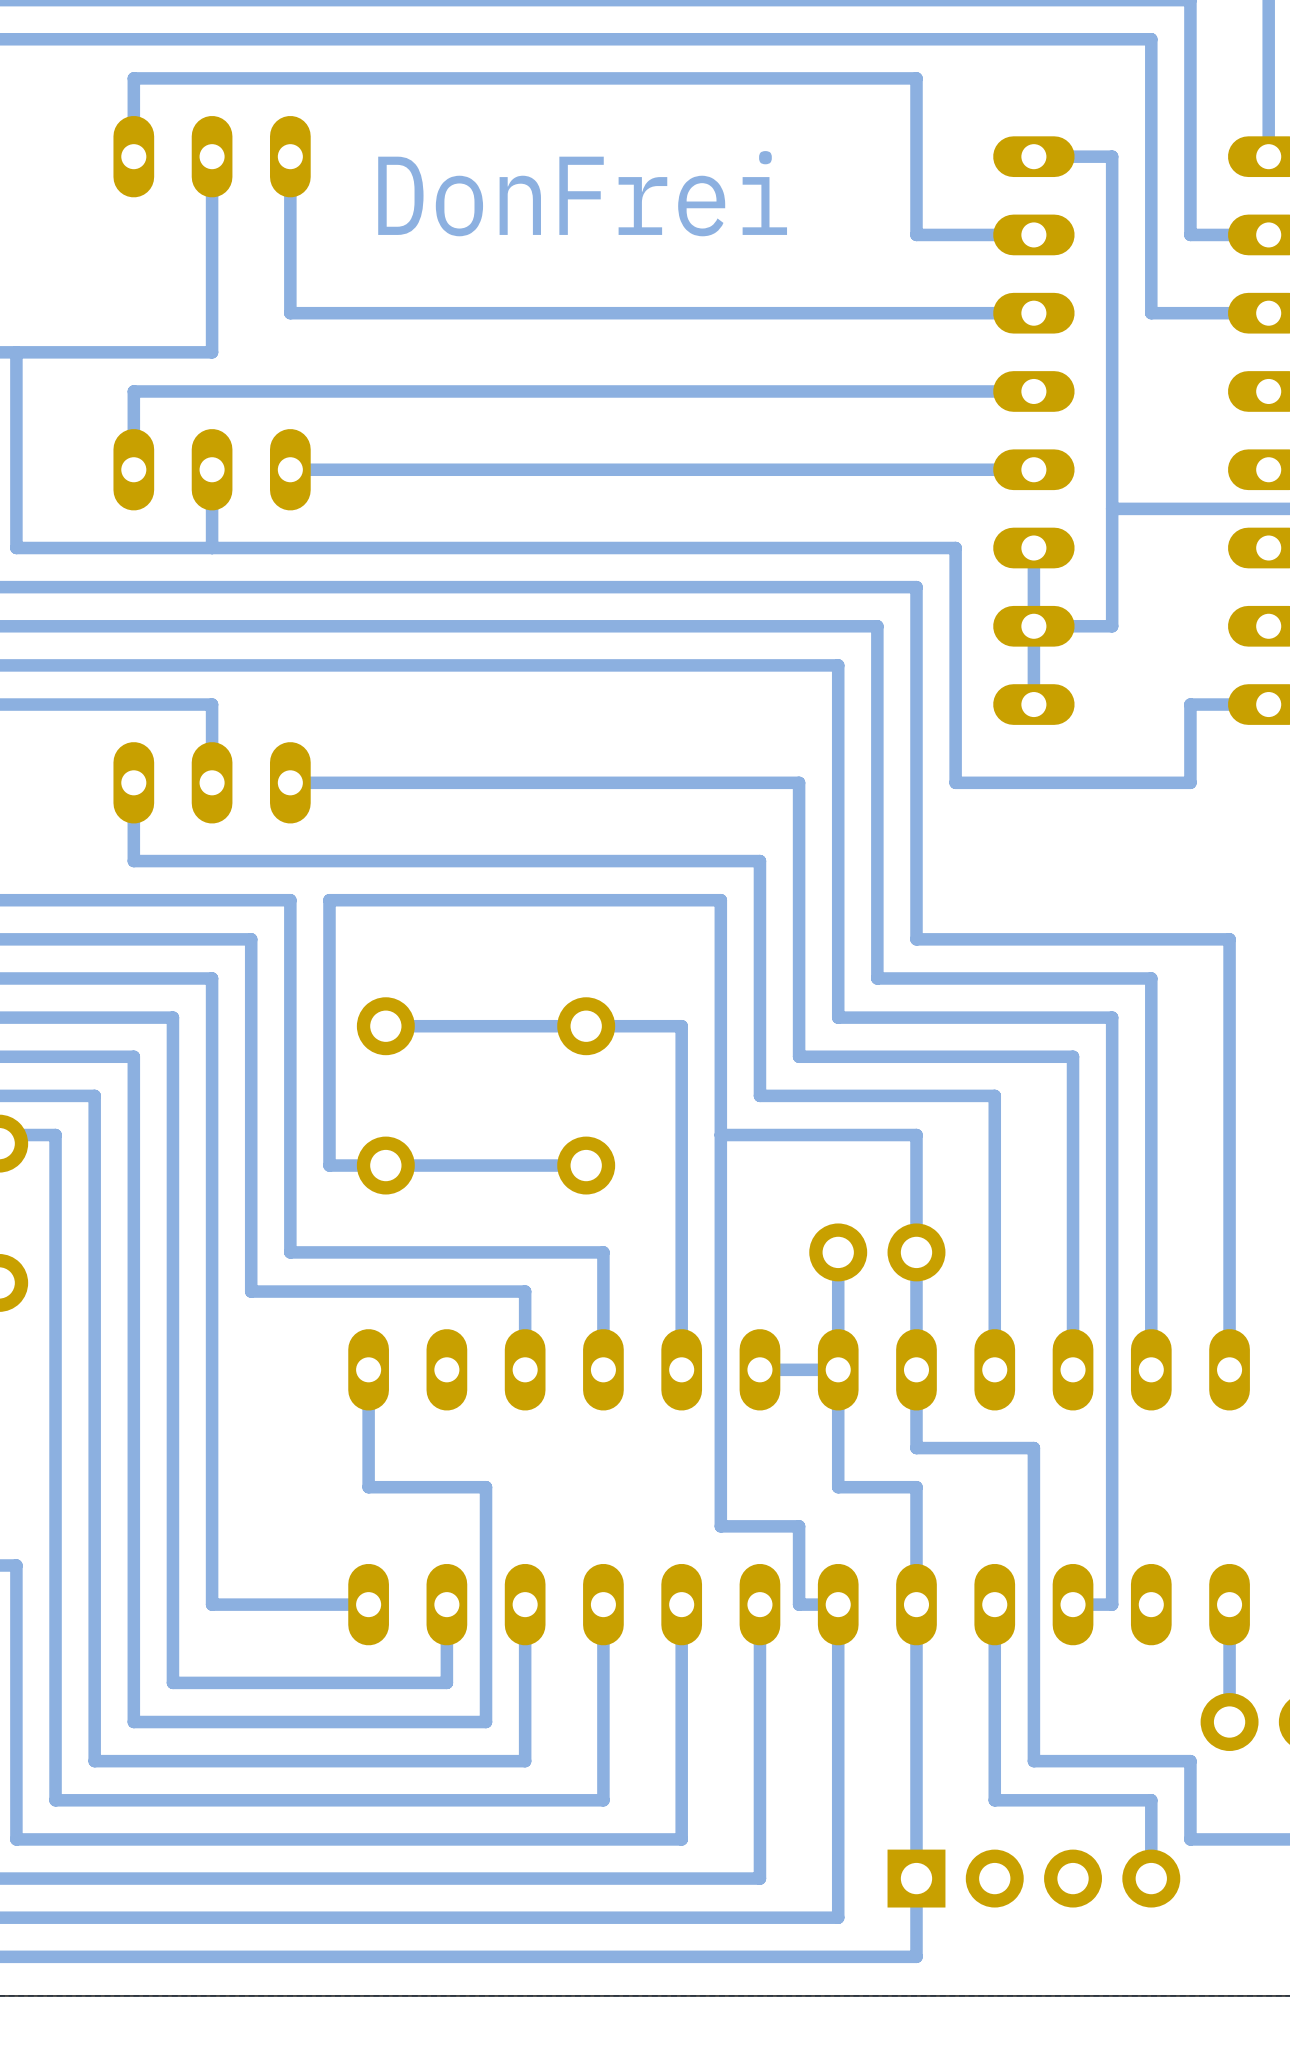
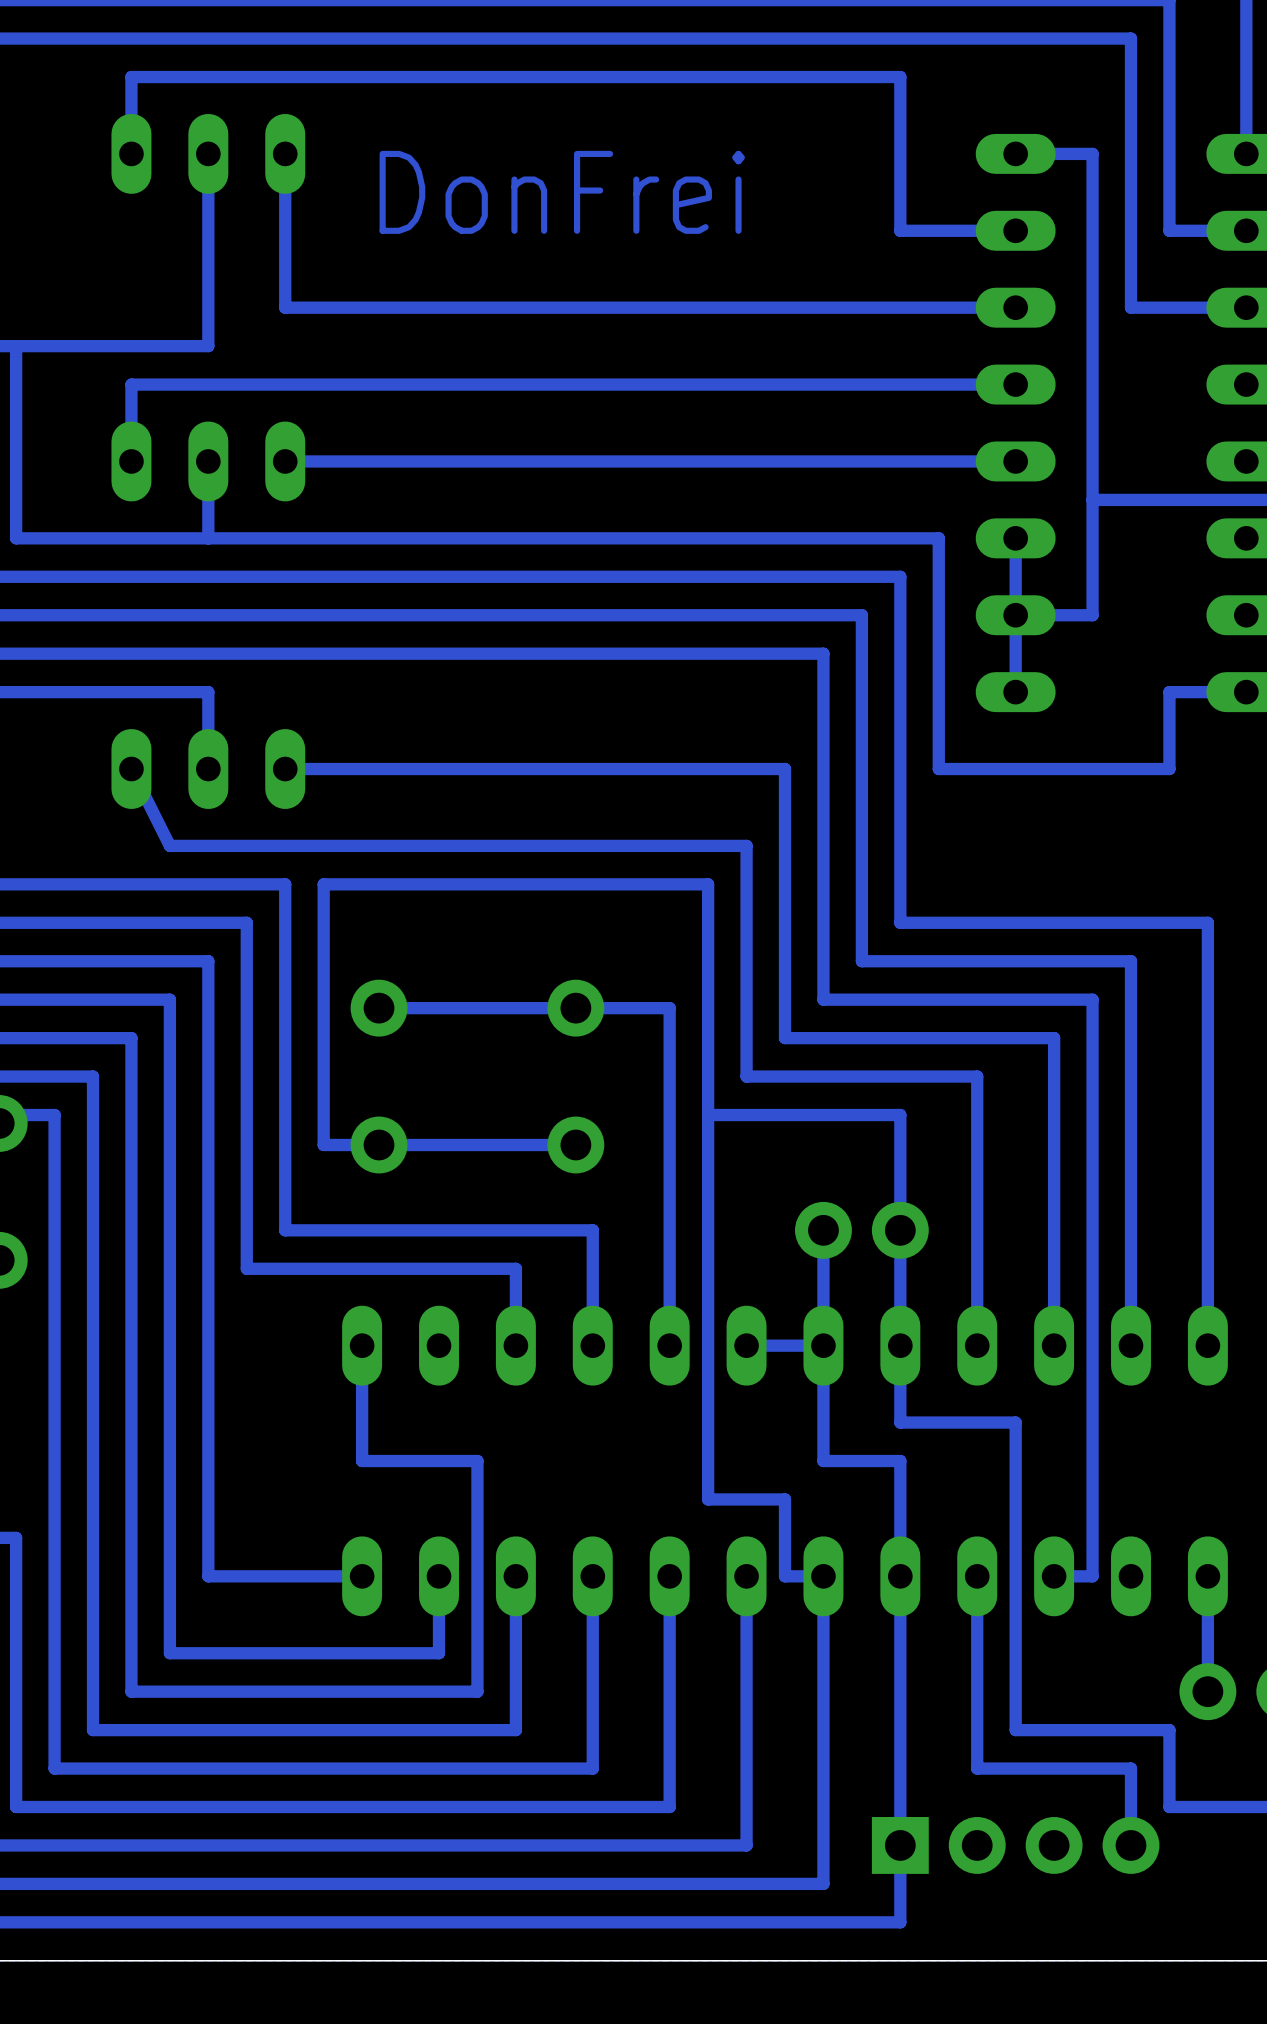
track: (133, 782) (133, 861) (172, 861) -> (131, 769) (169, 845)

